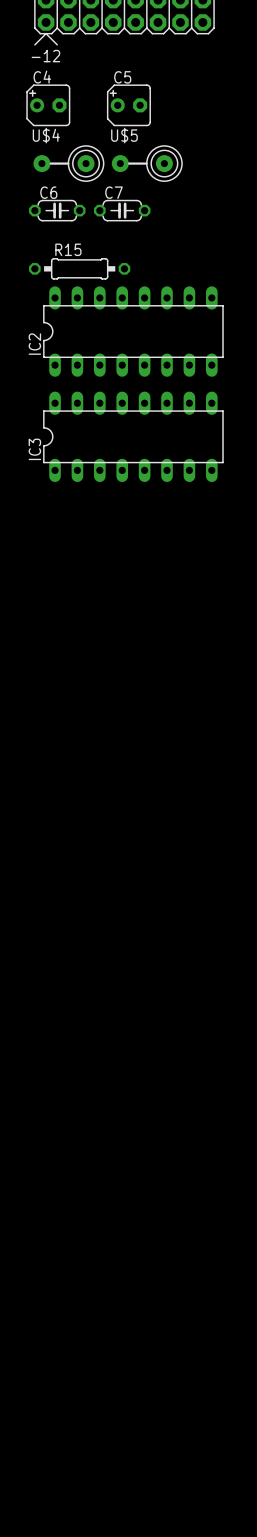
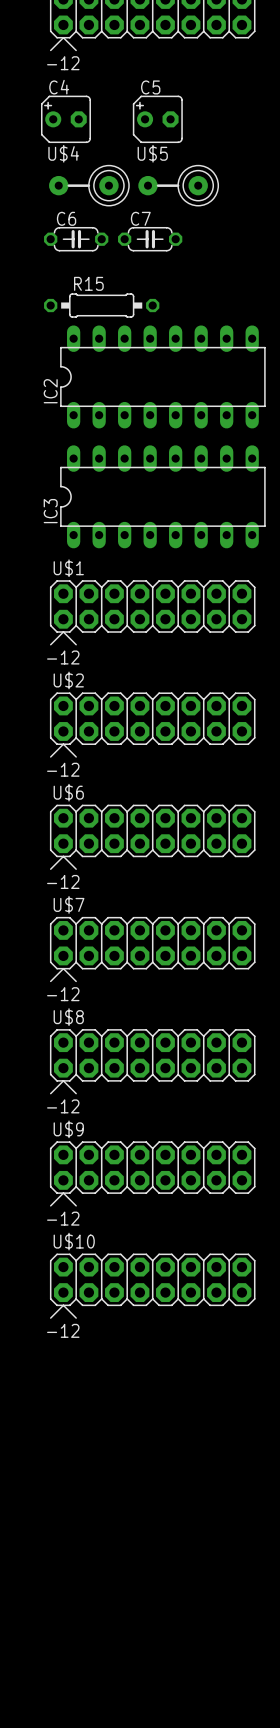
U$1: none -> (152, 612)
U$2: none -> (152, 725)
U$6: none -> (152, 837)
U$7: none -> (152, 949)
U$8: none -> (152, 1061)
U$9: none -> (152, 1173)
U$10: none -> (152, 1286)

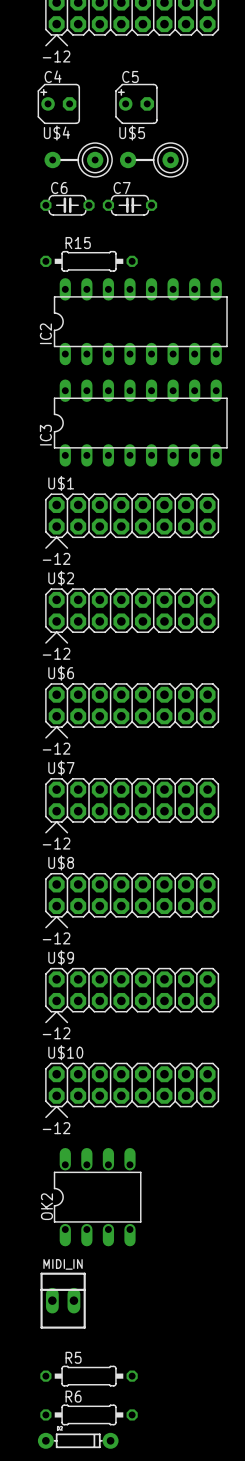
OK2: none -> (97, 1197)
MIDI_IN: none -> (63, 1300)
R5: none -> (89, 1376)
R6: none -> (89, 1414)
part: none -> (78, 1440)

